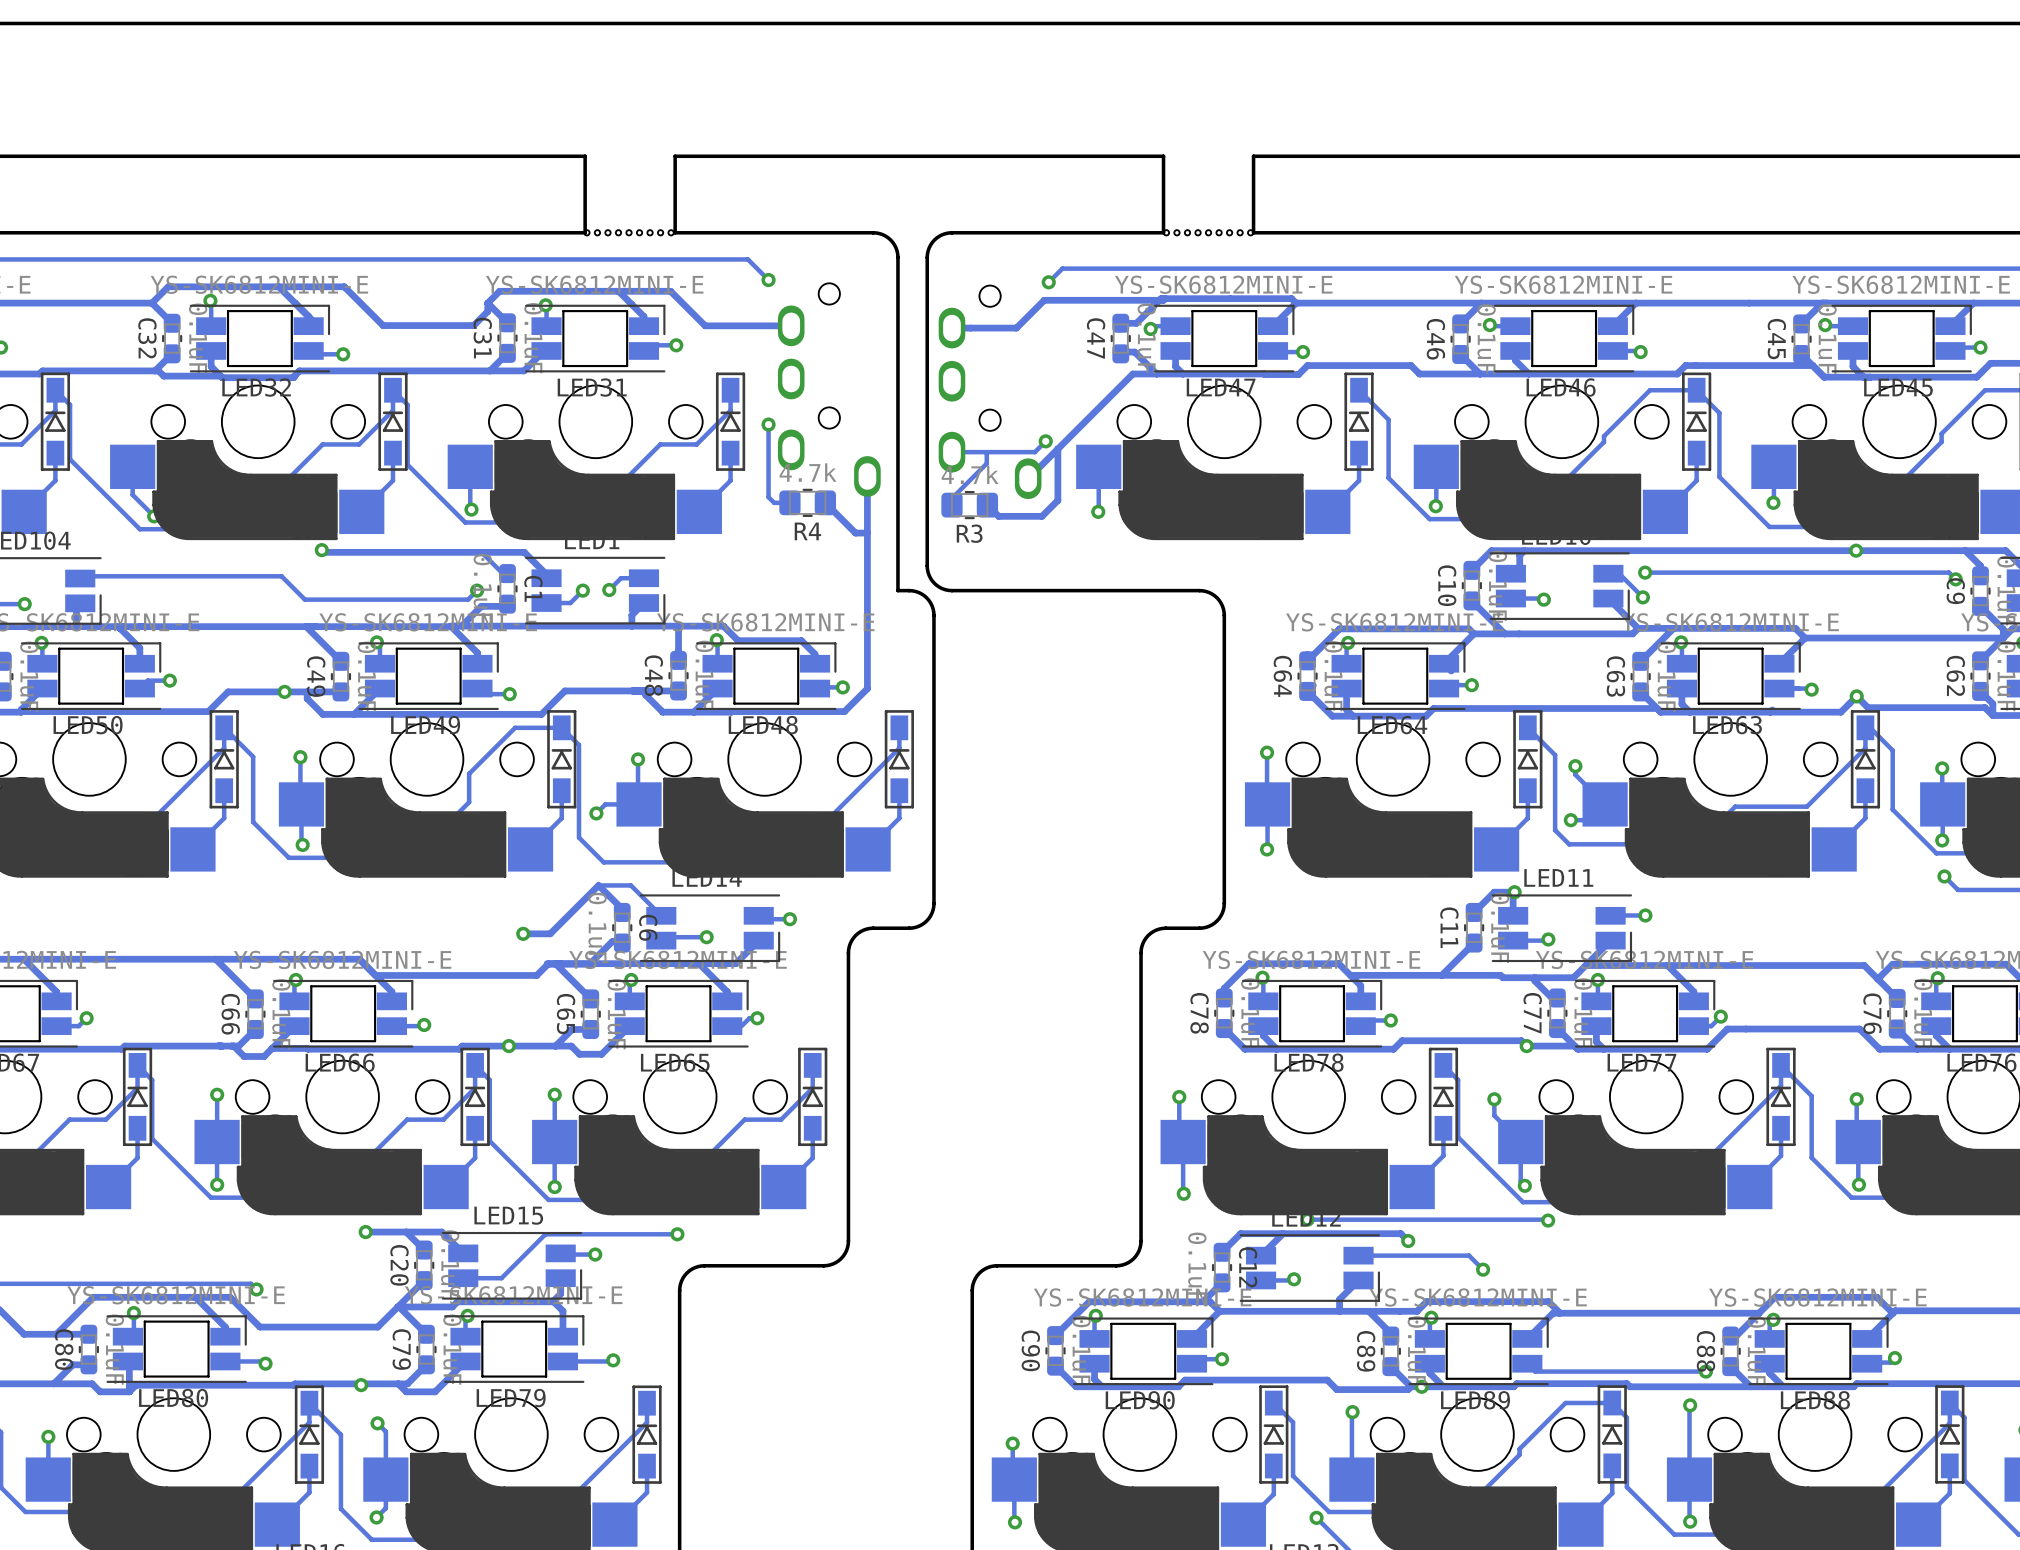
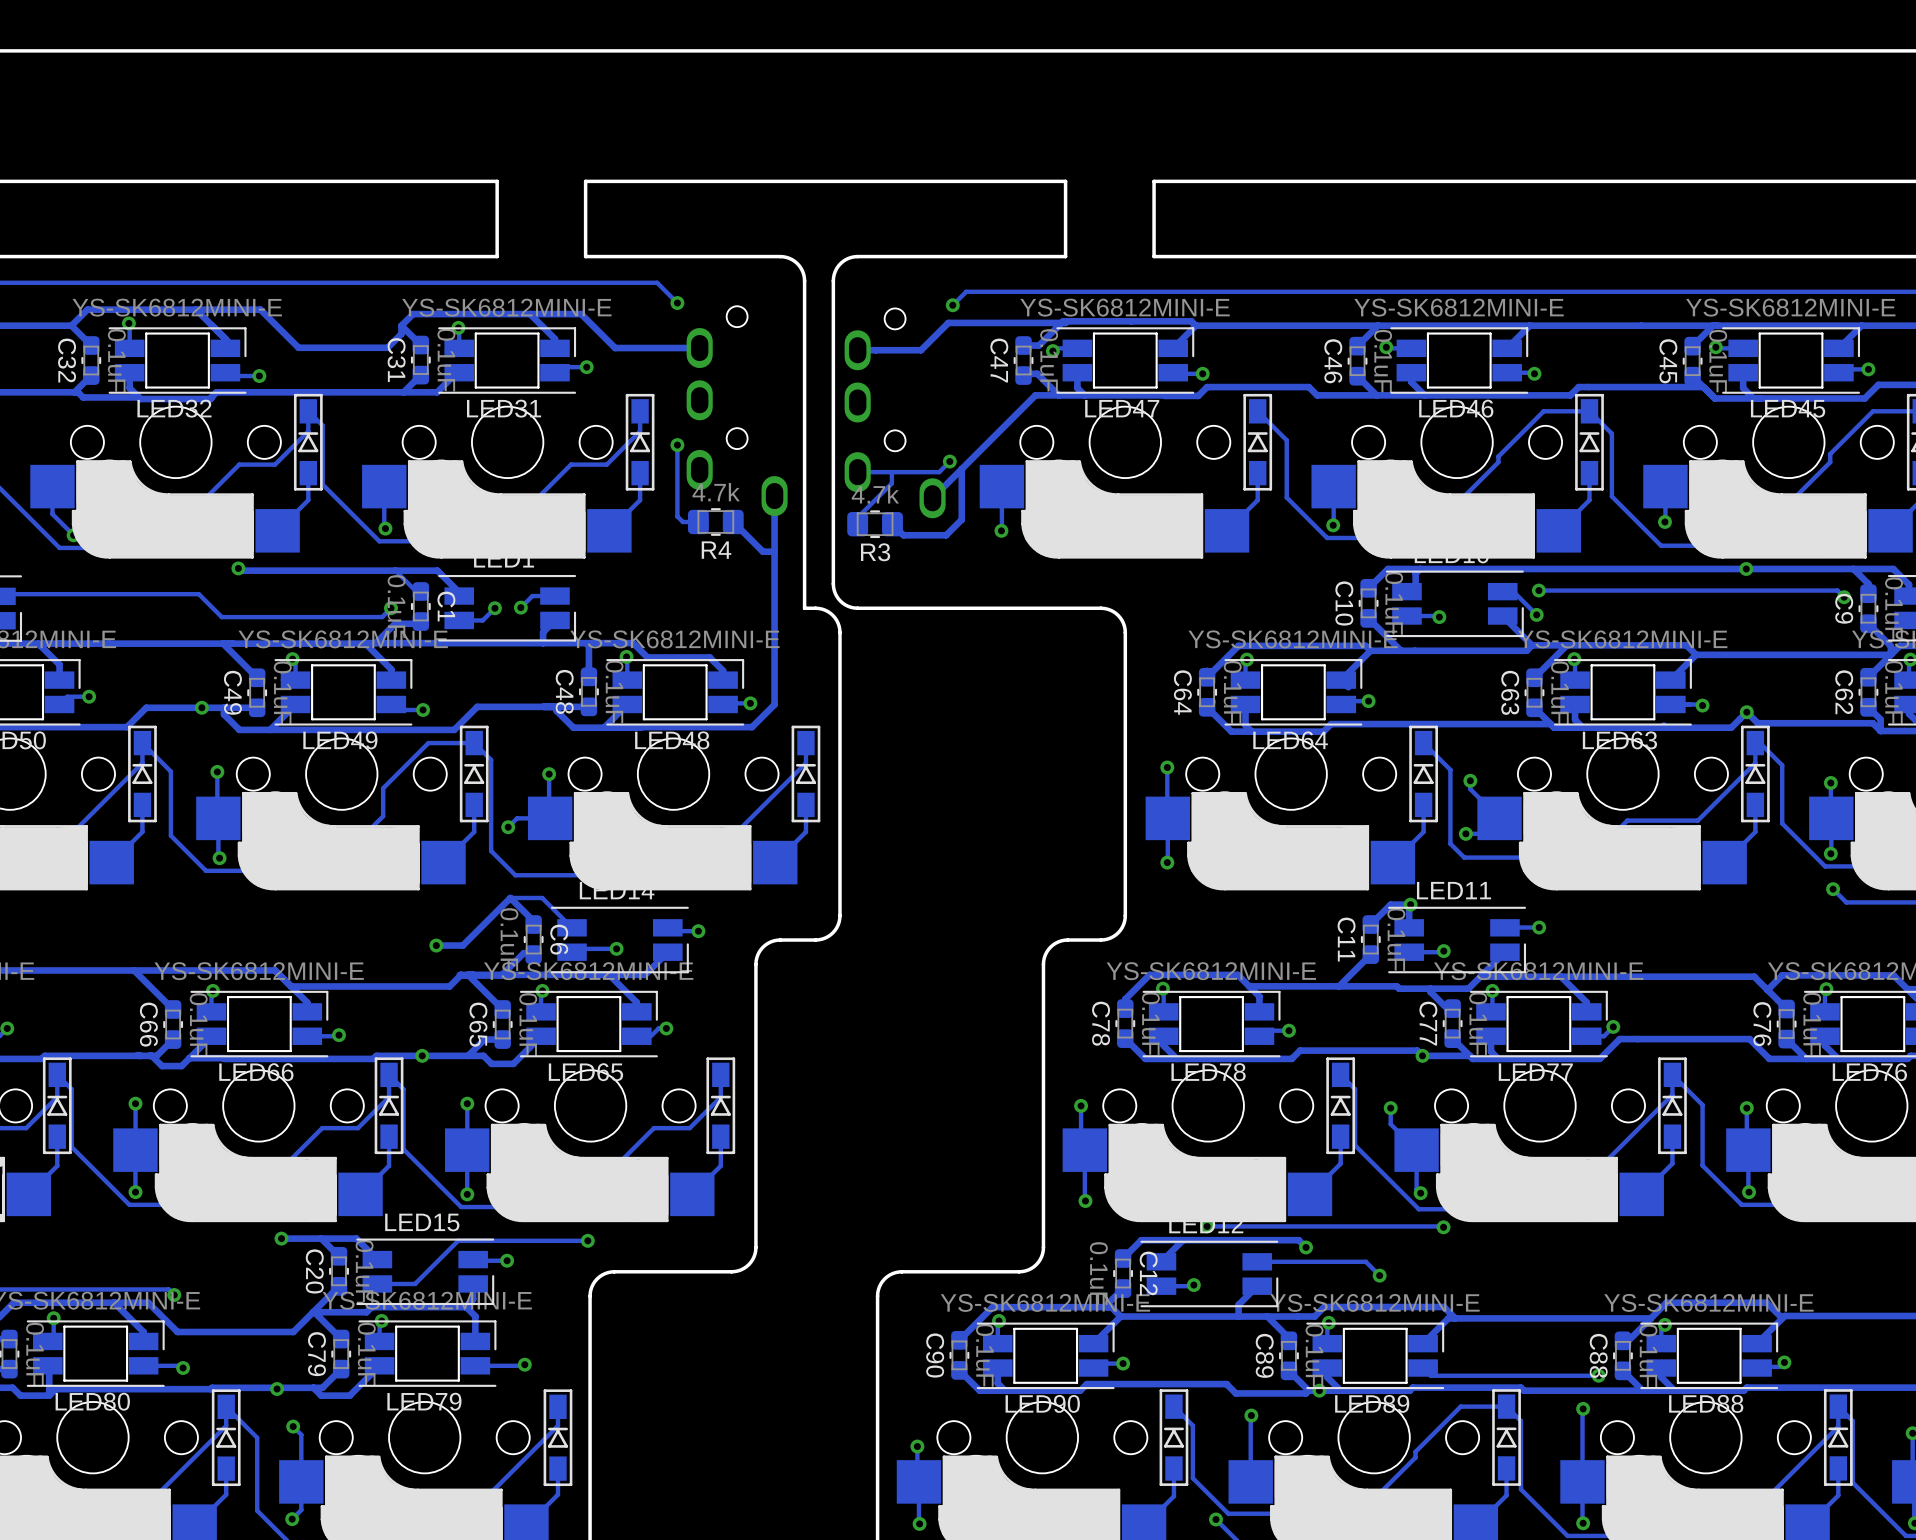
part: (629, 232) -> none
part: (1208, 232) -> none

